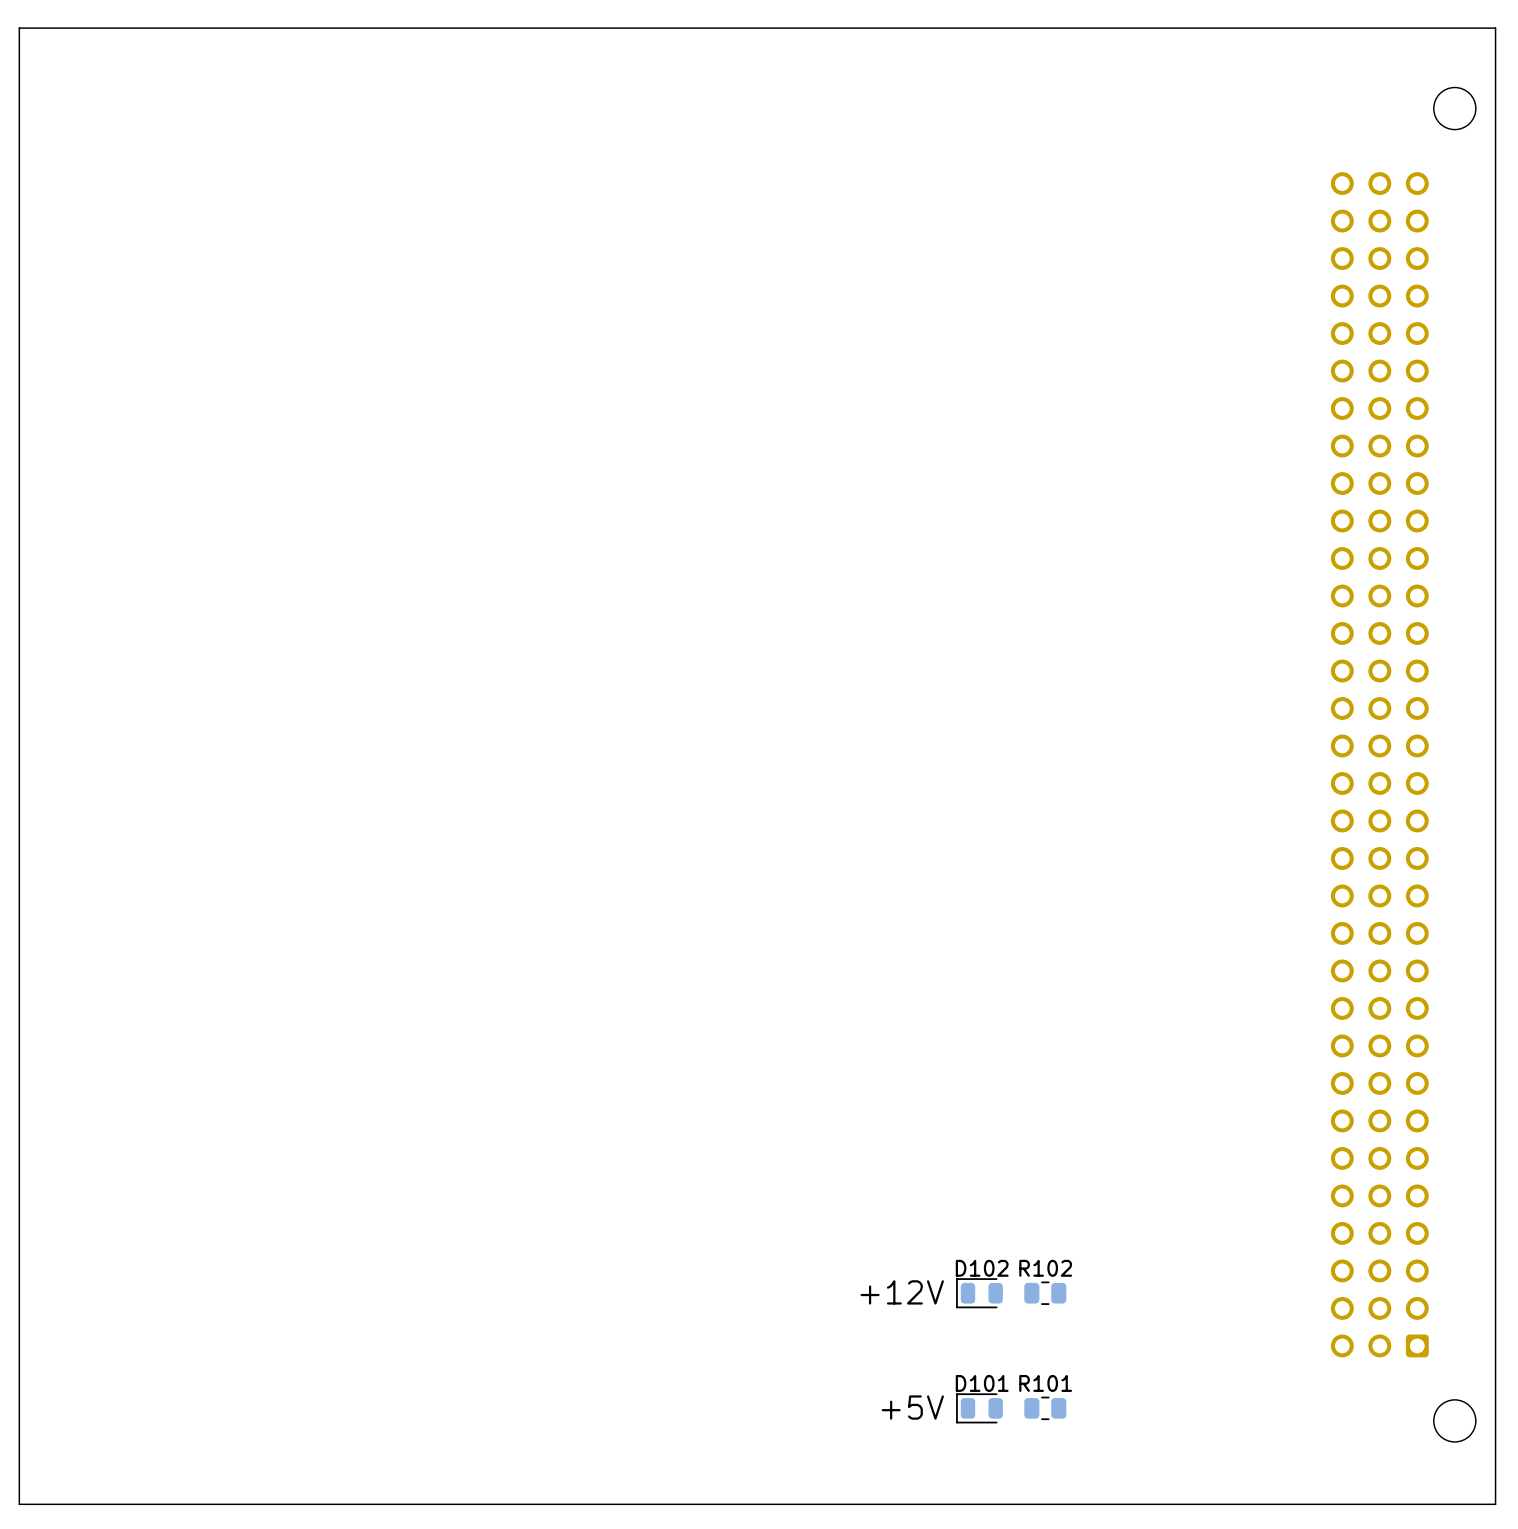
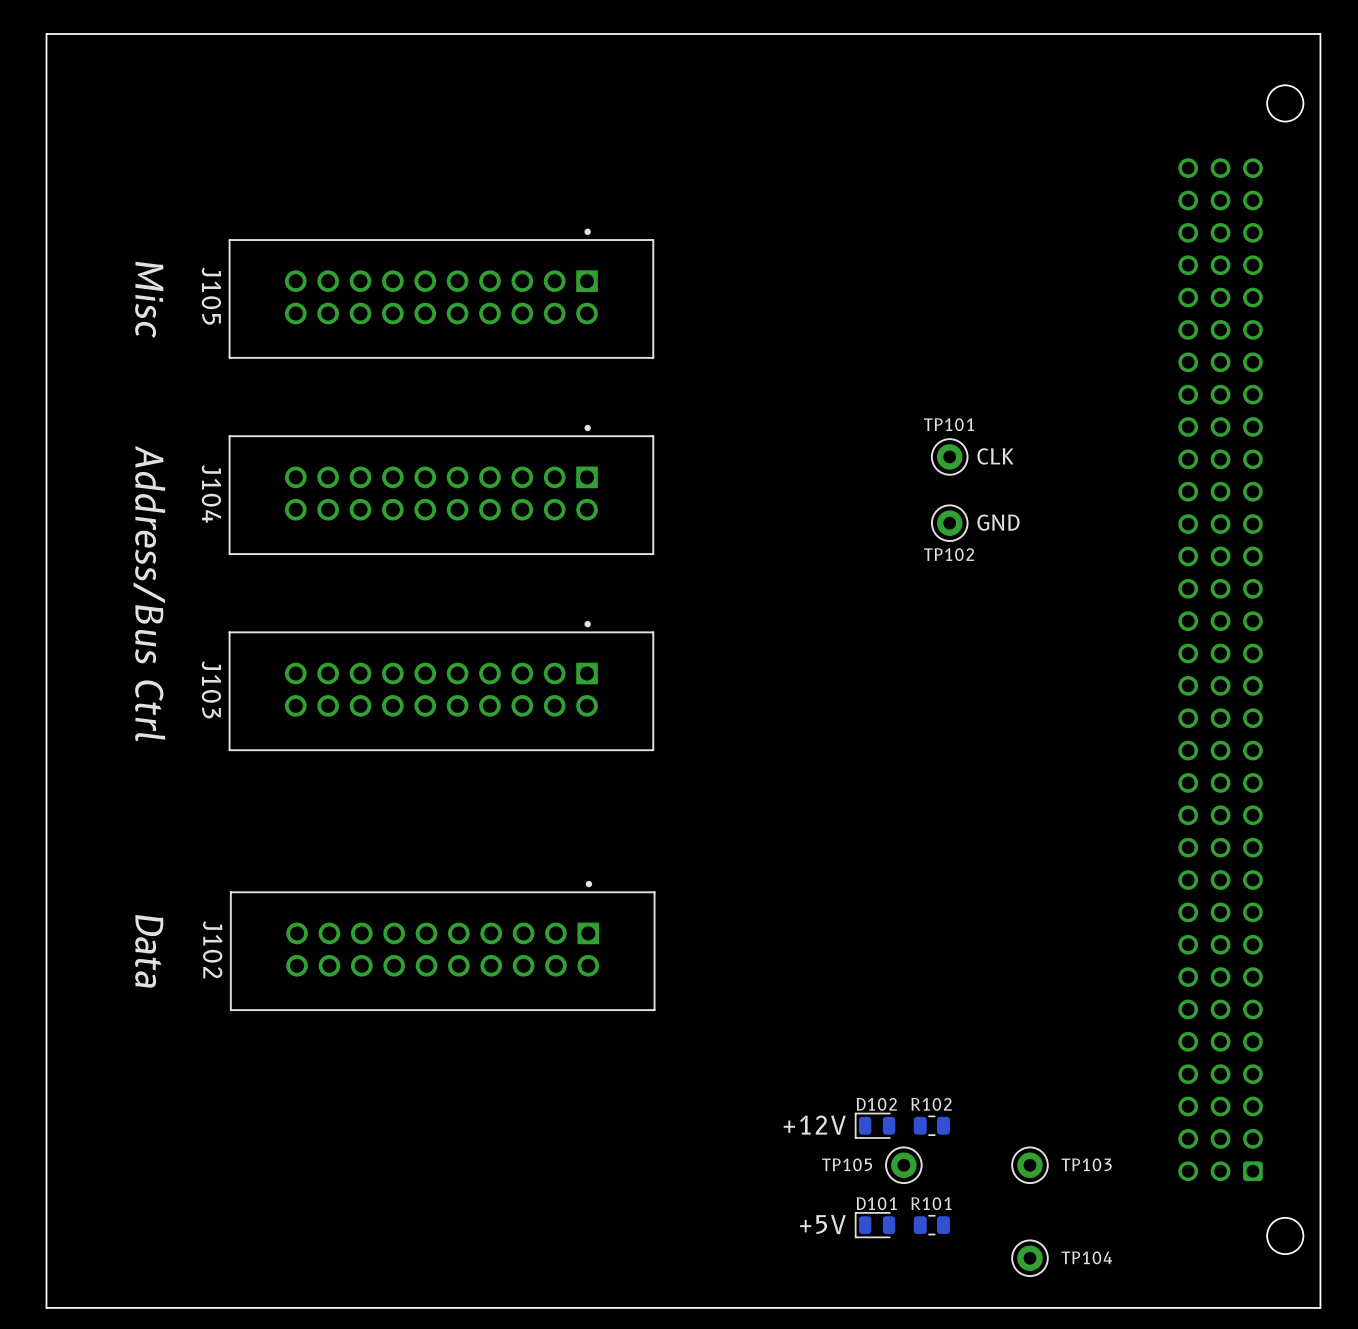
J105: none -> (441, 293)
text: none -> Misc (149, 299)
TP101: none -> CLK (949, 456)
J104: none -> (441, 489)
TP102: none -> GND (949, 523)
text: none -> Address/Bus Ctrl (149, 593)
J103: none -> (441, 686)
J102: none -> (442, 945)
text: none -> Data (149, 951)
TP105: none -> (903, 1165)
TP103: none -> (1029, 1165)
TP104: none -> (1029, 1258)

